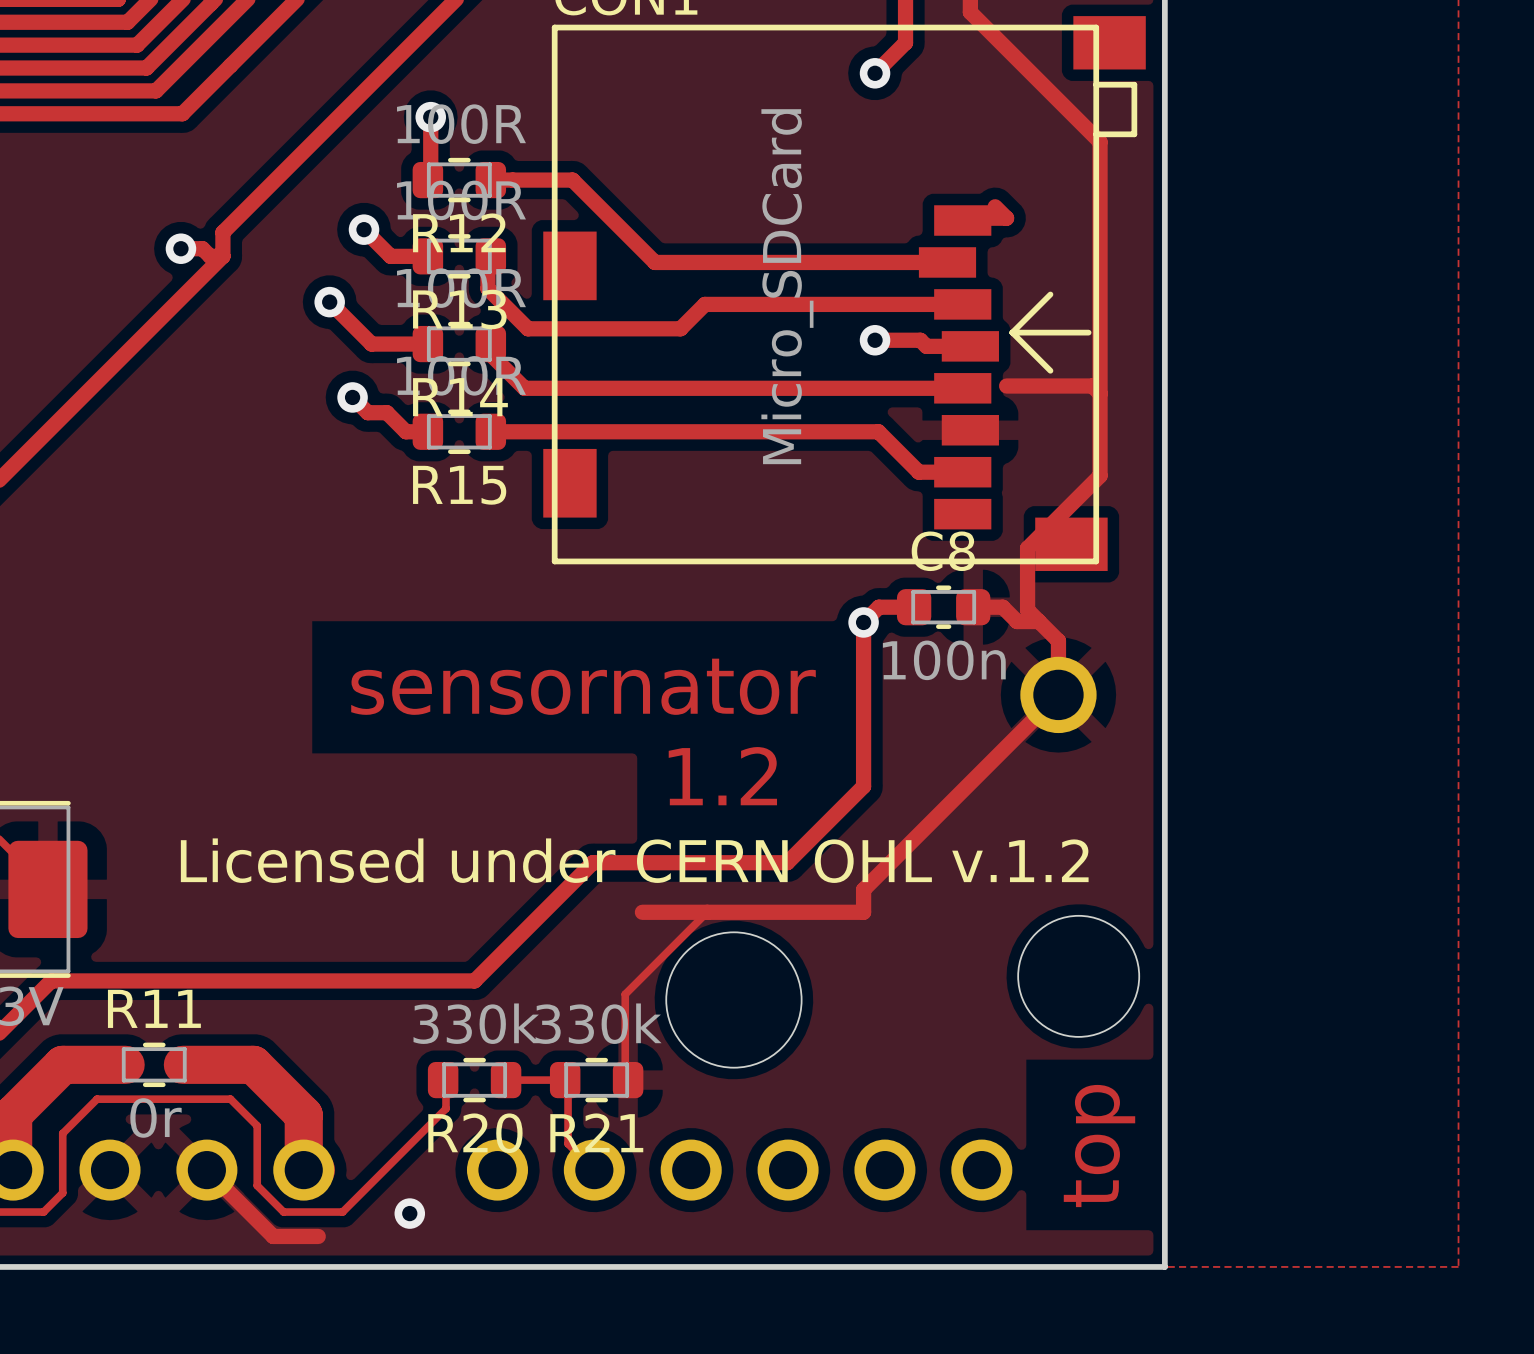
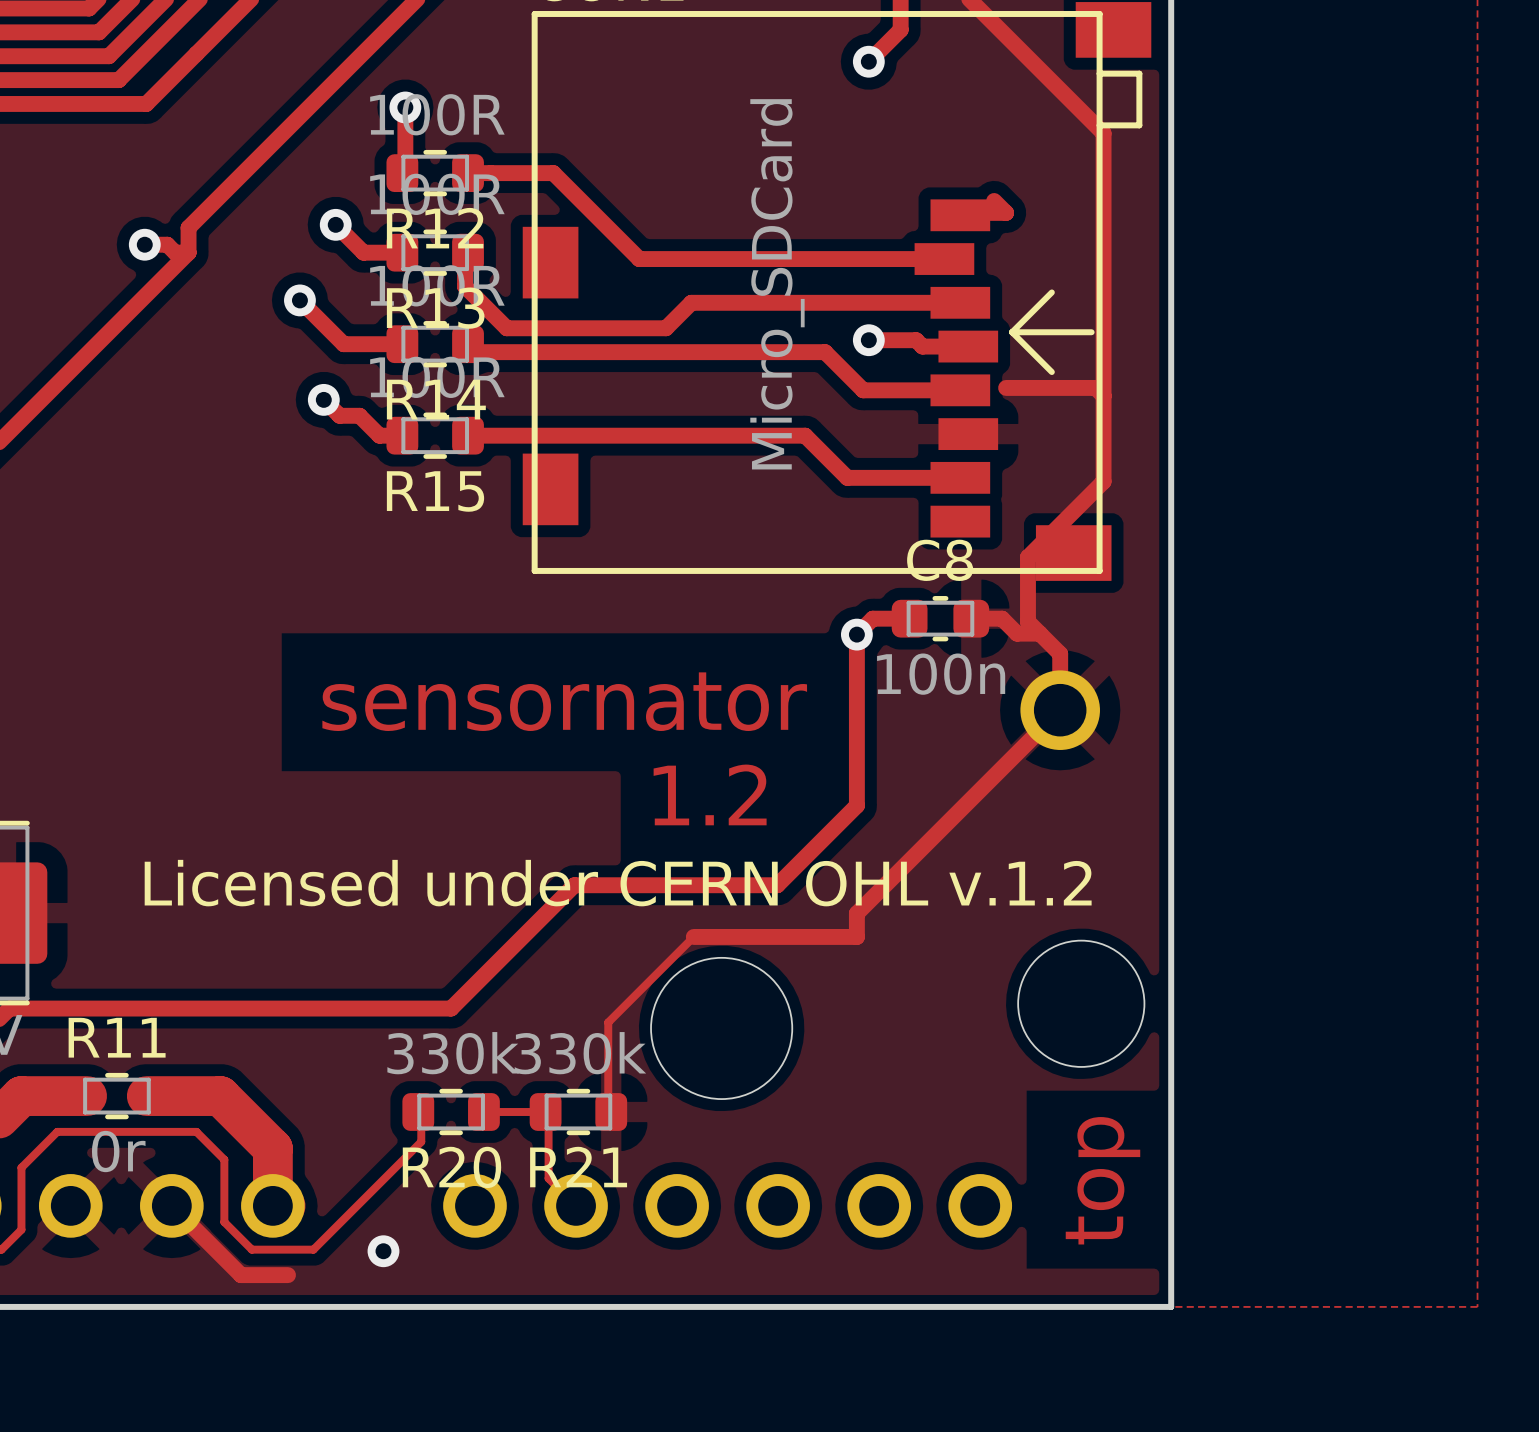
track: (487, 344) (487, 351) (524, 388) (869, 388) -> (468, 344) (475, 352) (825, 352) (863, 390)
track: (814, 431) (878, 431) (918, 472) -> (805, 435) (847, 477) (914, 477)
track: (642, 912) (707, 912) -> none

